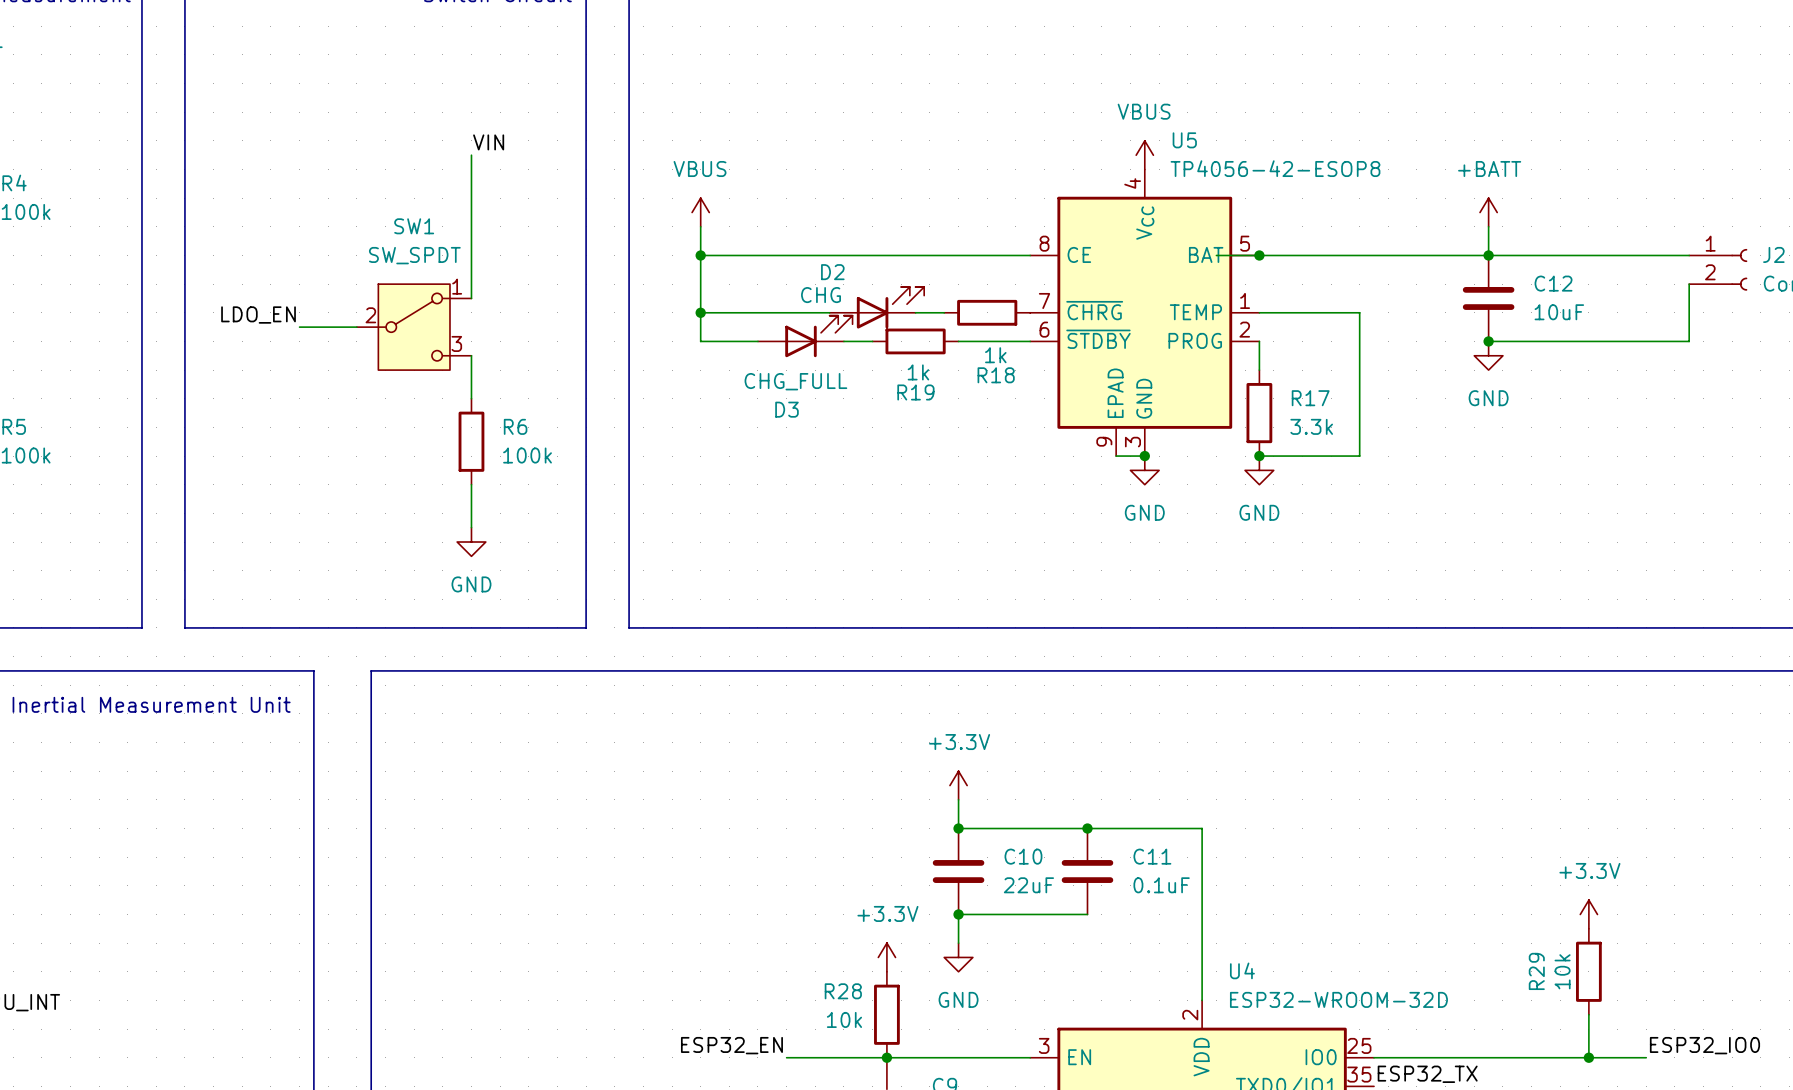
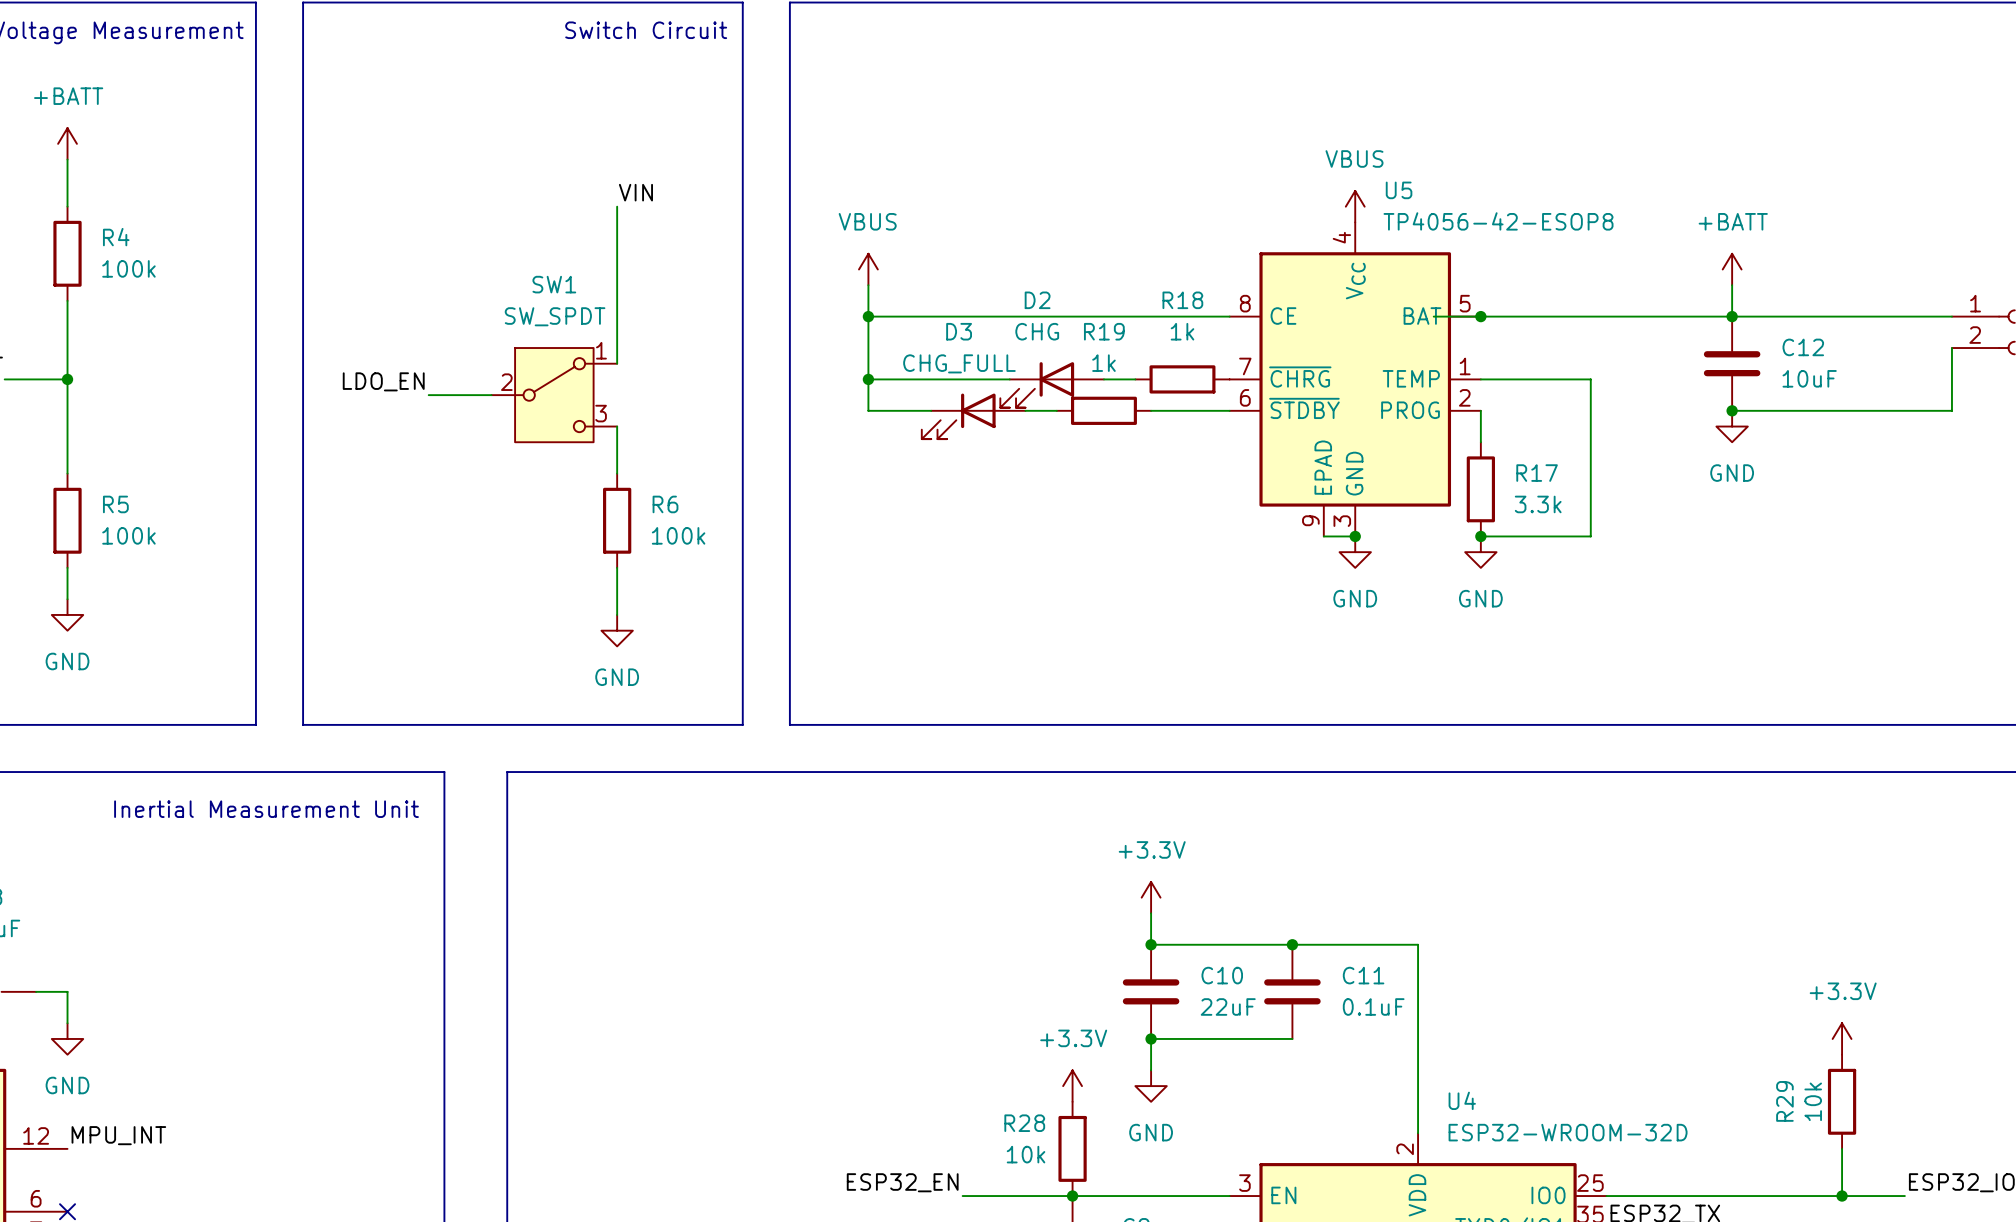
D2 name position: D2 (832, 272) -> D2 (1037, 300)
D2 value position: CHG (821, 295) -> CHG (1037, 331)
D2 rotation: 0° (890, 307) -> 180° (1037, 384)
D3 rotation: 0° (818, 336) -> 180° (958, 416)
R18 value position: 1k (995, 355) -> 1k (1182, 331)
R19 value position: 1k (918, 372) -> 1k (1103, 363)
R18 name position: R18 (996, 375) -> R18 (1182, 300)
D3 value position: CHG_FULL (795, 381) -> CHG_FULL (959, 363)
R19 name position: R19 (915, 392) -> R19 (1104, 331)
D3 name position: D3 (786, 409) -> D3 (959, 331)

